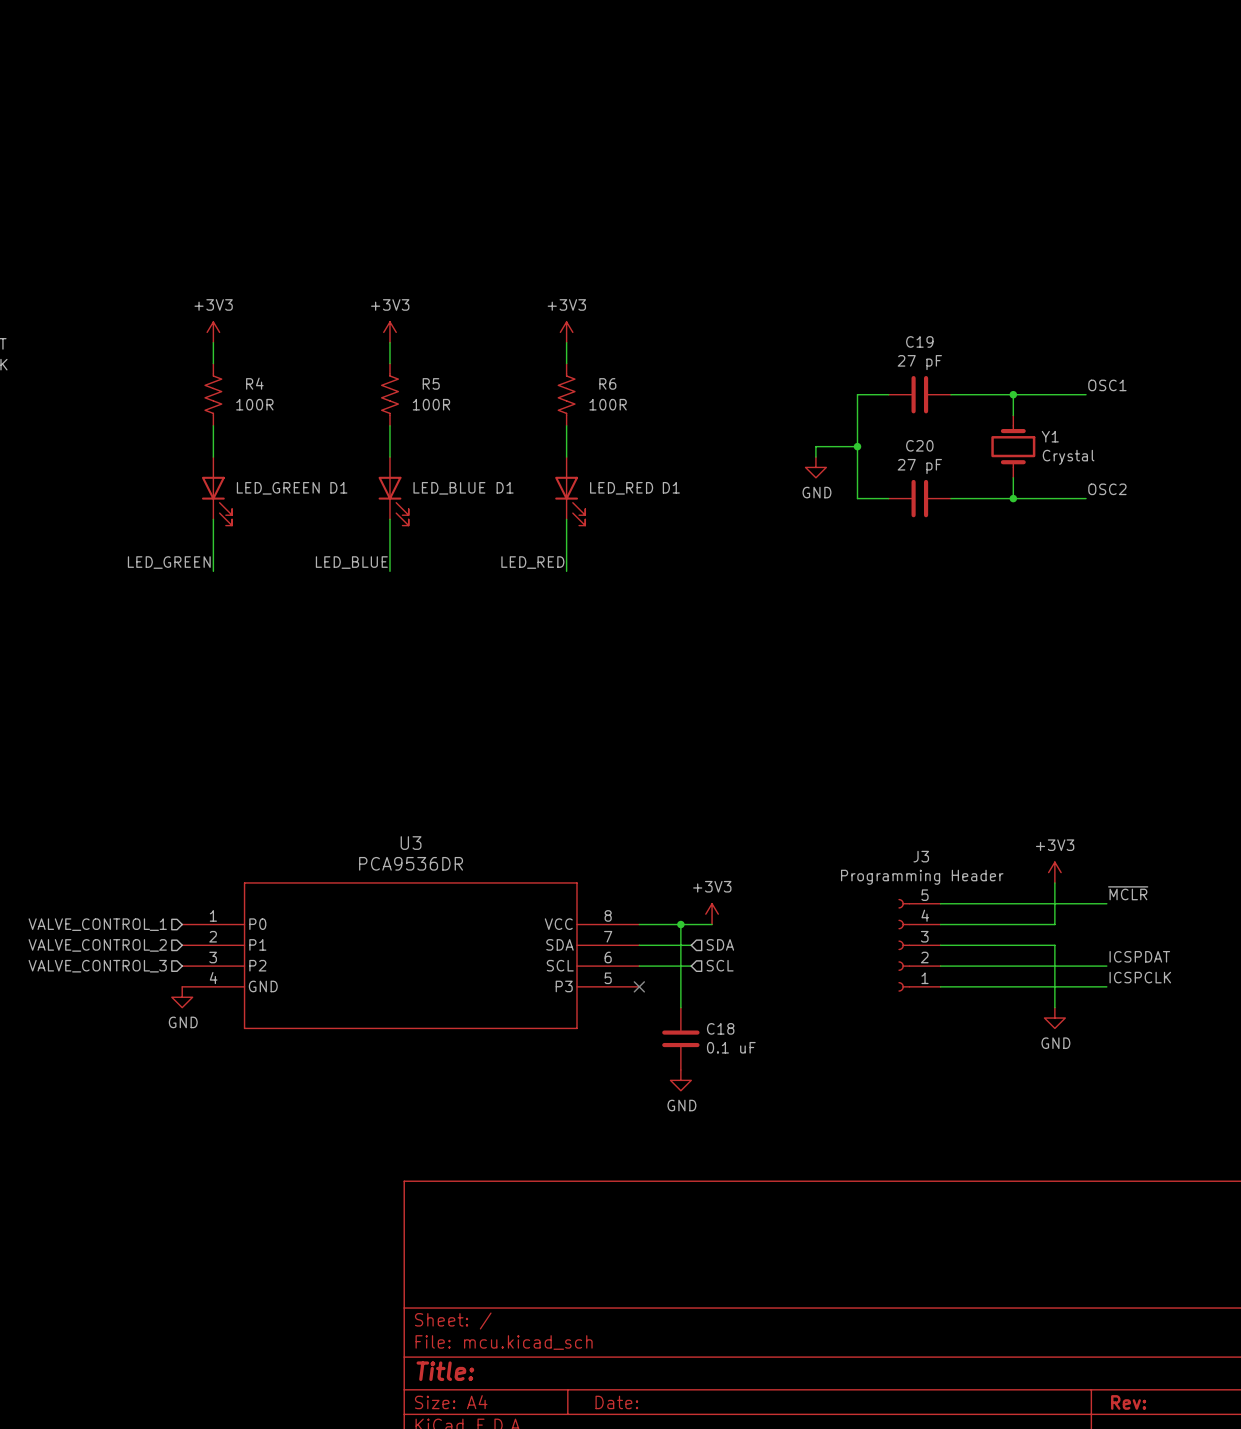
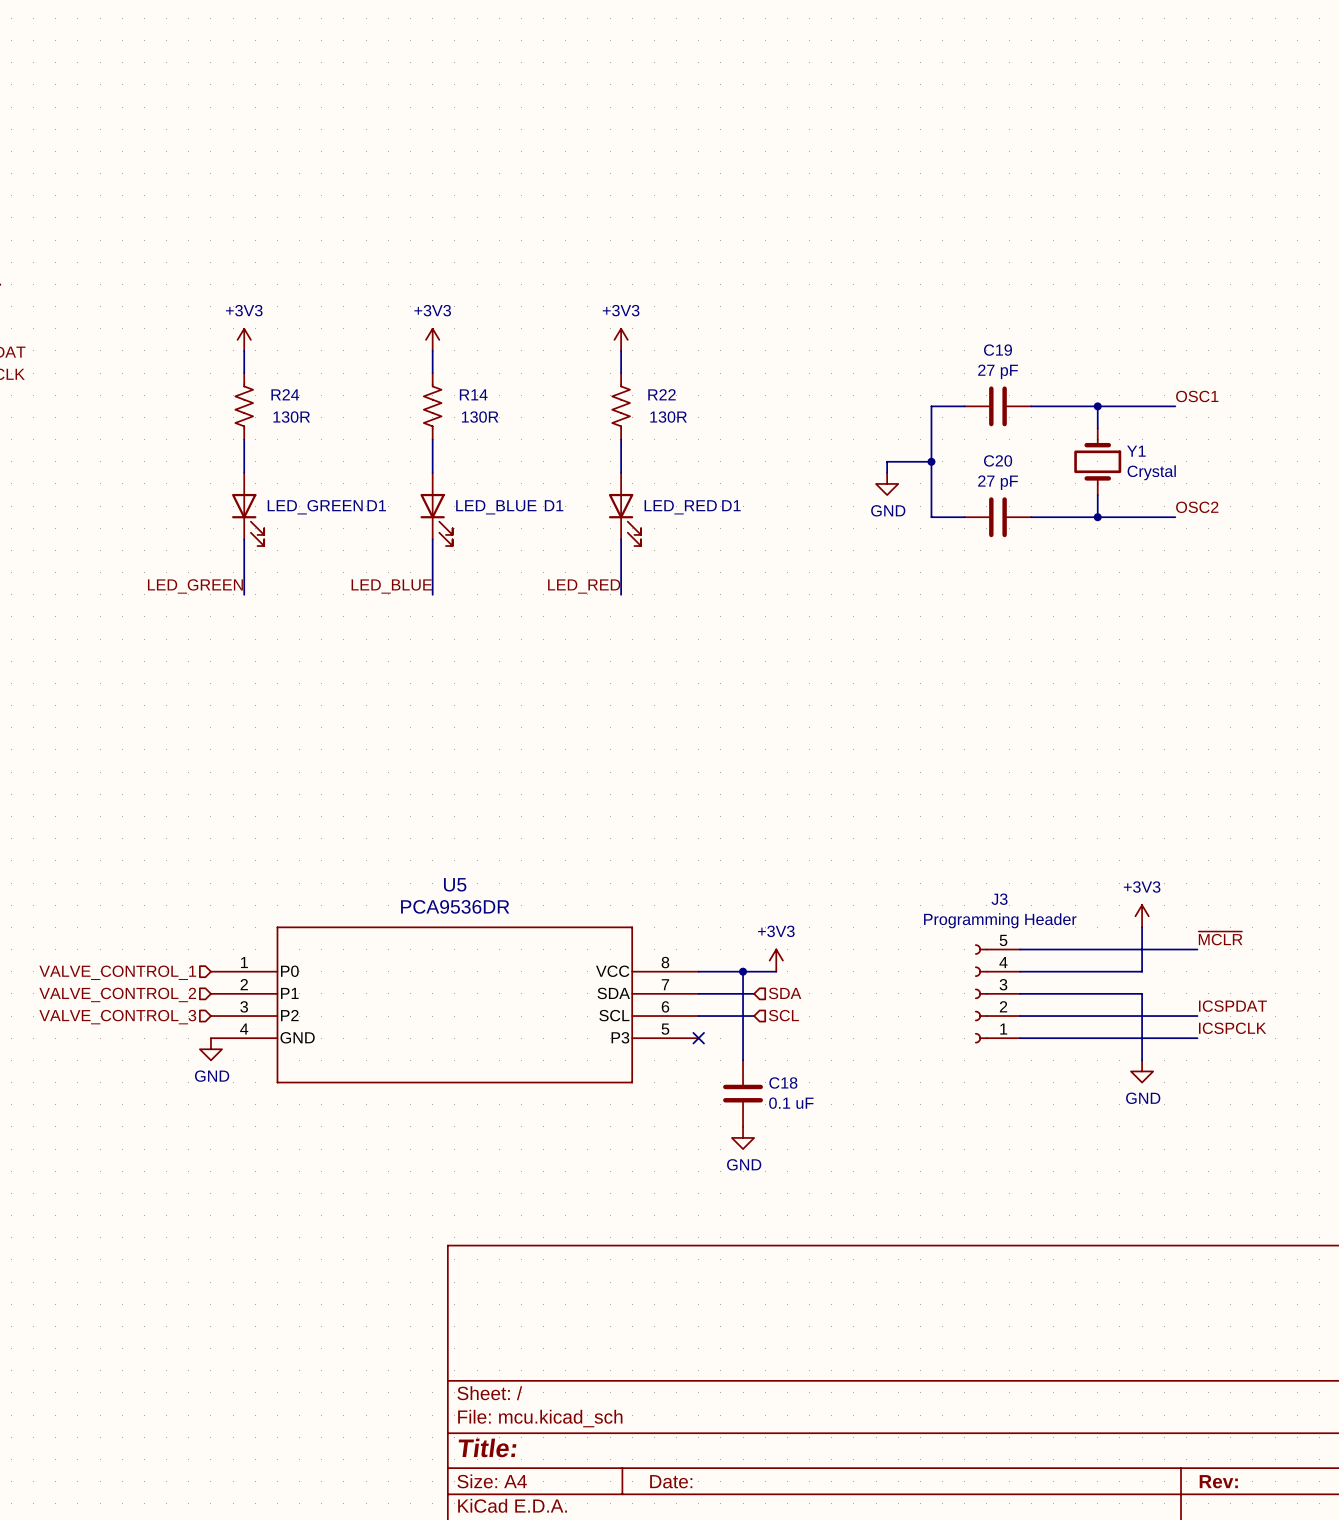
R4 name: R4 (254, 383) -> R24 (285, 394)
R5 name: R5 (431, 383) -> R14 (473, 394)
R6 name: R6 (607, 383) -> R22 (662, 394)
R4 value: 100R (254, 404) -> 130R (291, 417)
R5 value: 100R (431, 404) -> 130R (480, 417)
R6 value: 100R (608, 404) -> 130R (668, 417)
U3 name: U3 (411, 843) -> U5 (455, 884)

